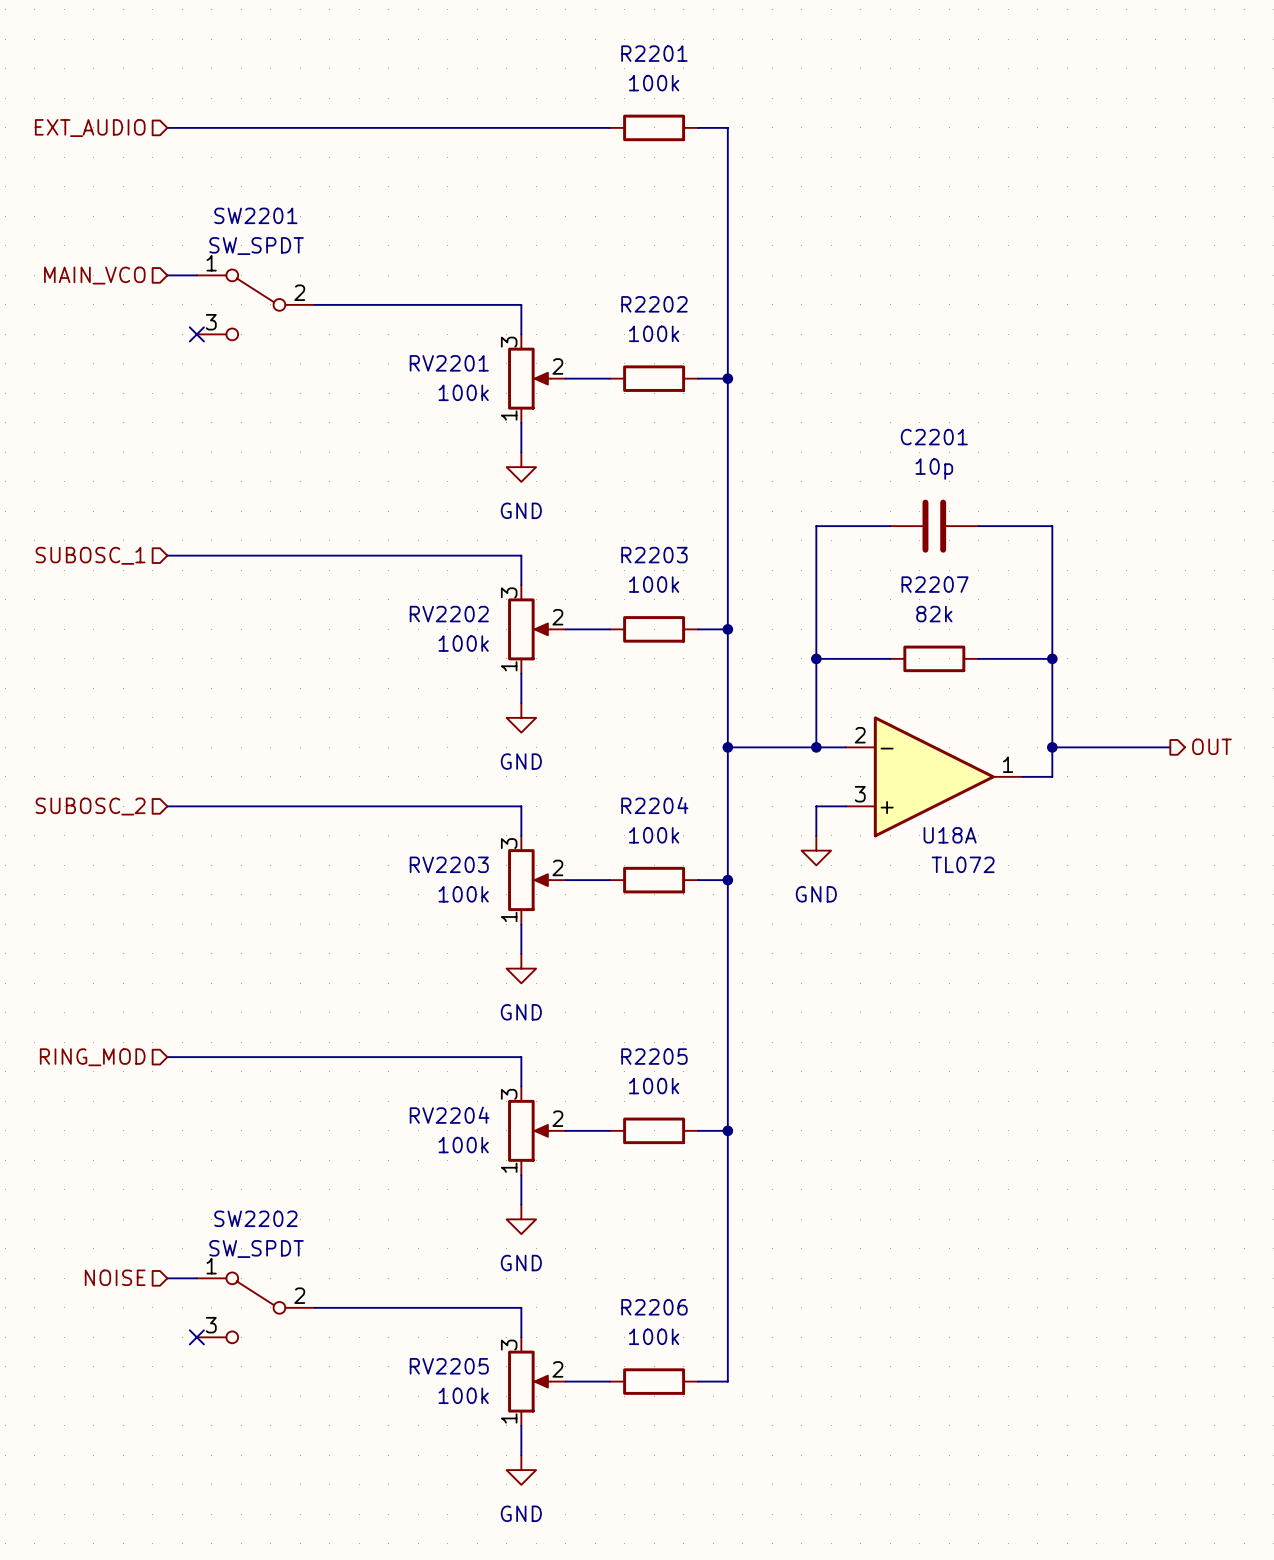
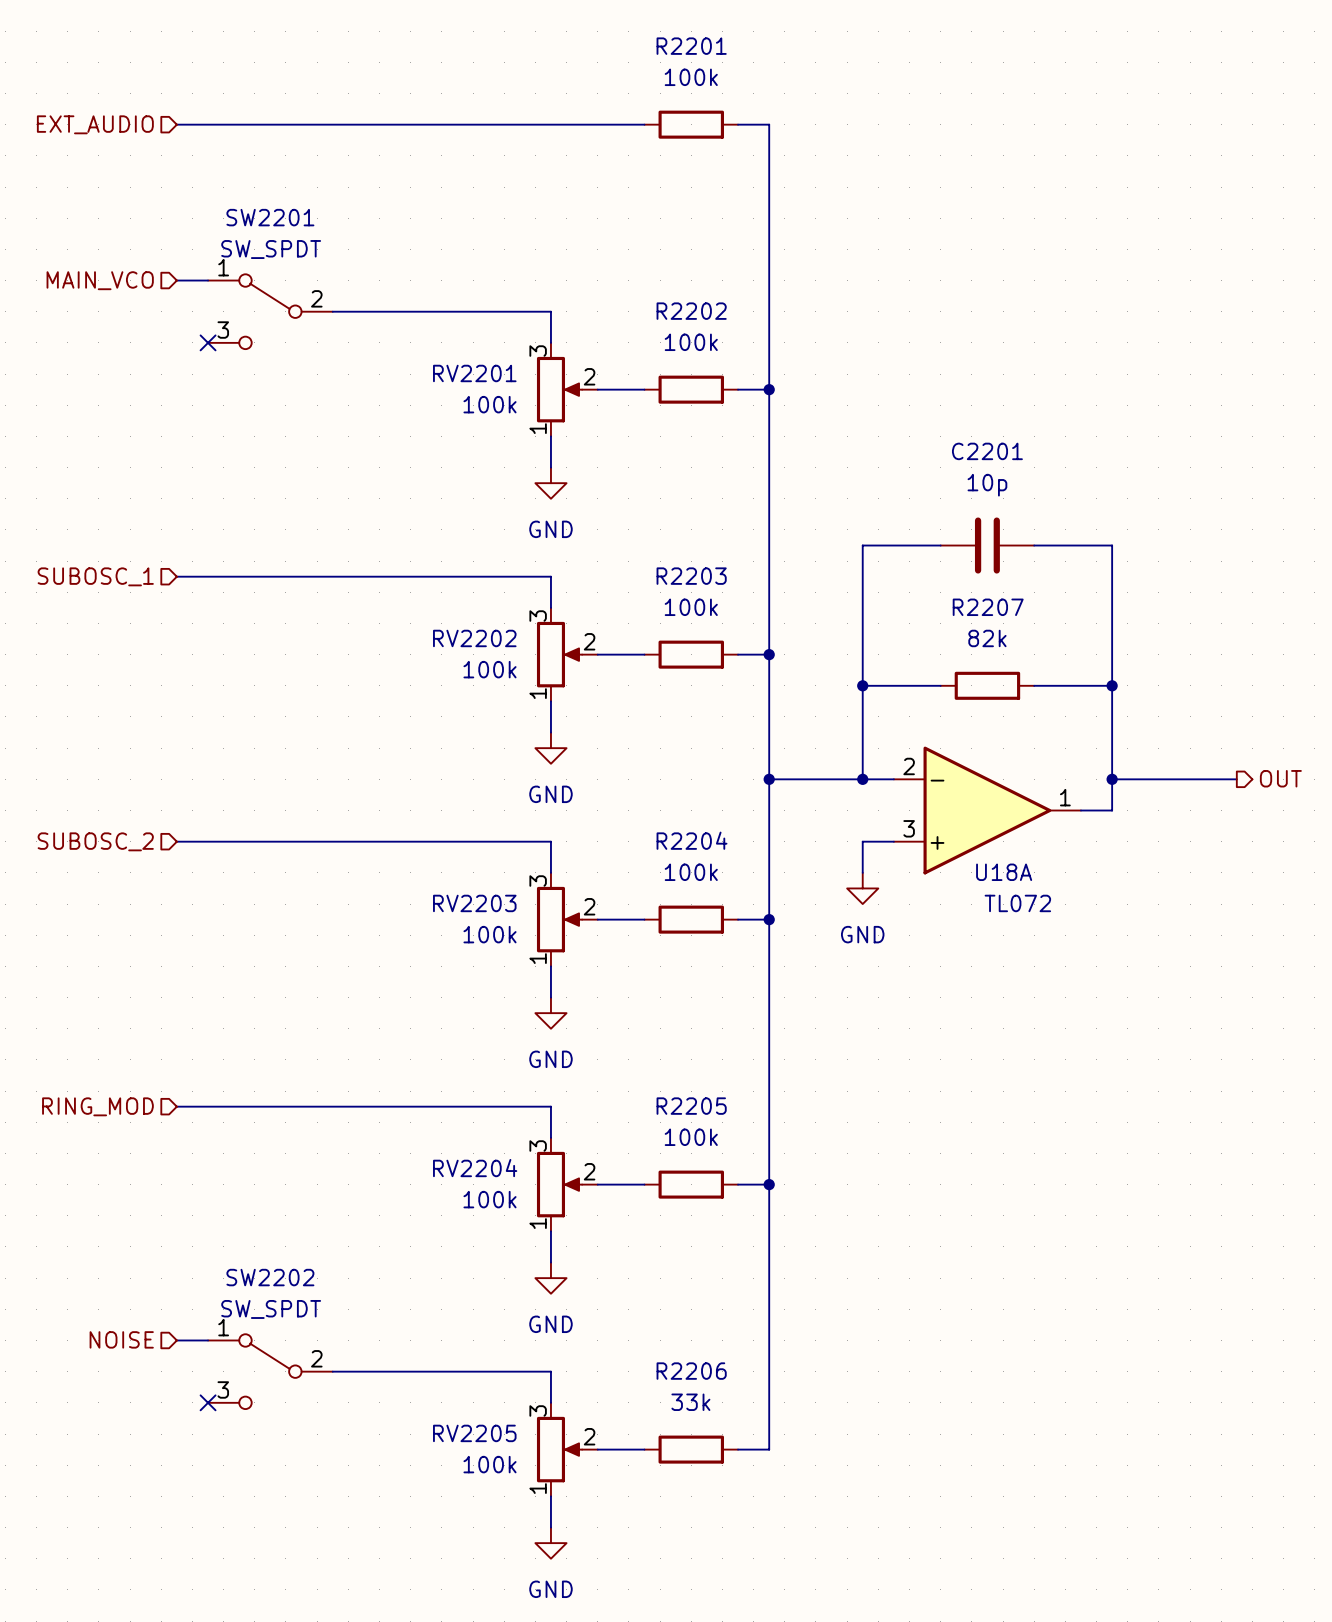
R2206 value: 100k (654, 1336) -> 33k (690, 1402)

